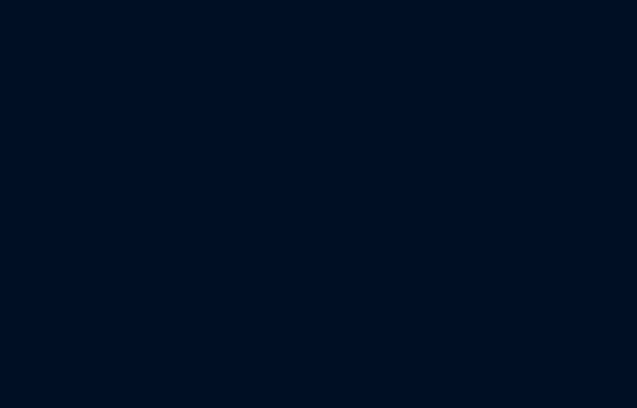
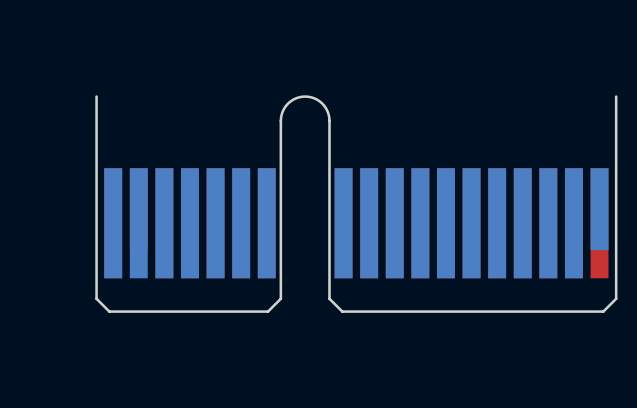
part: none -> (356, 204)

